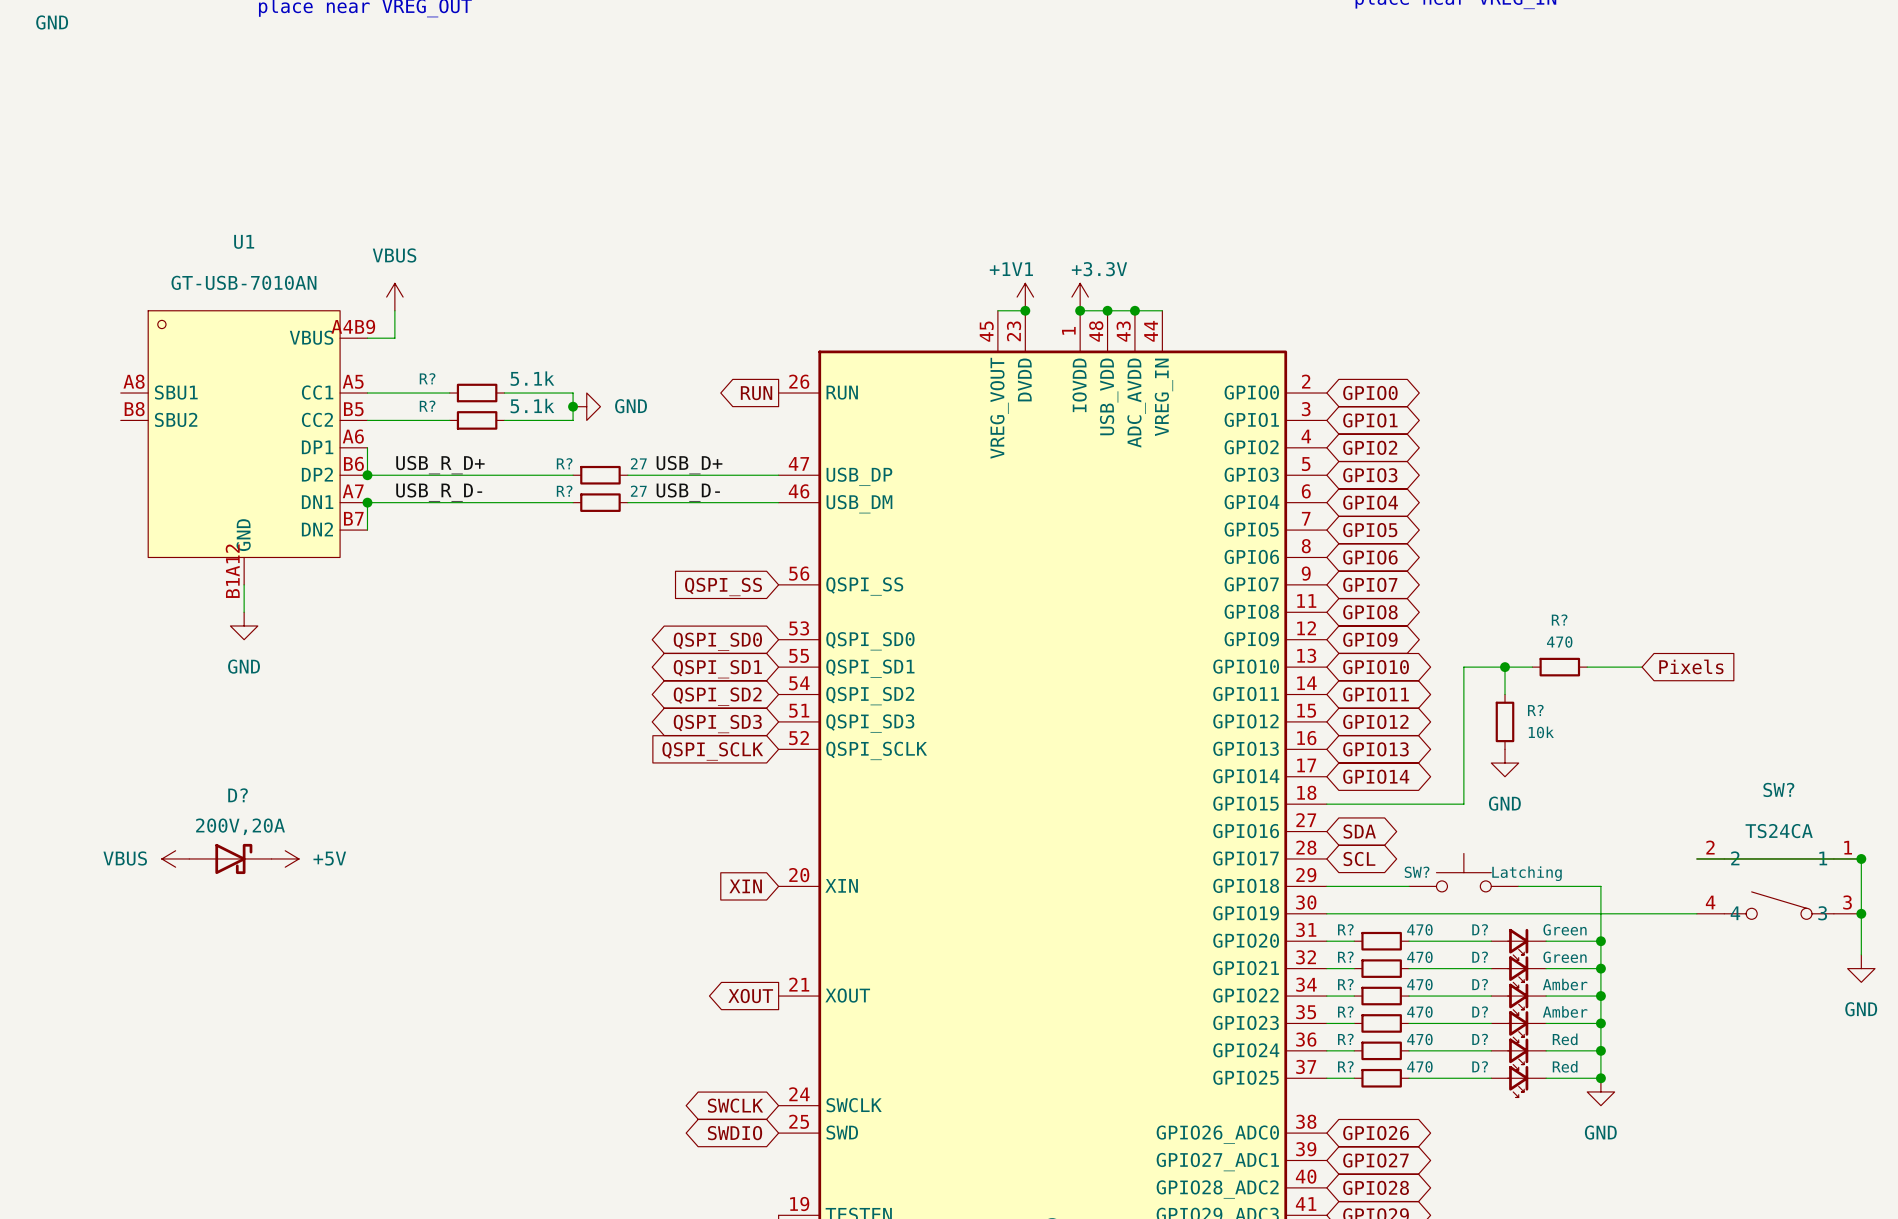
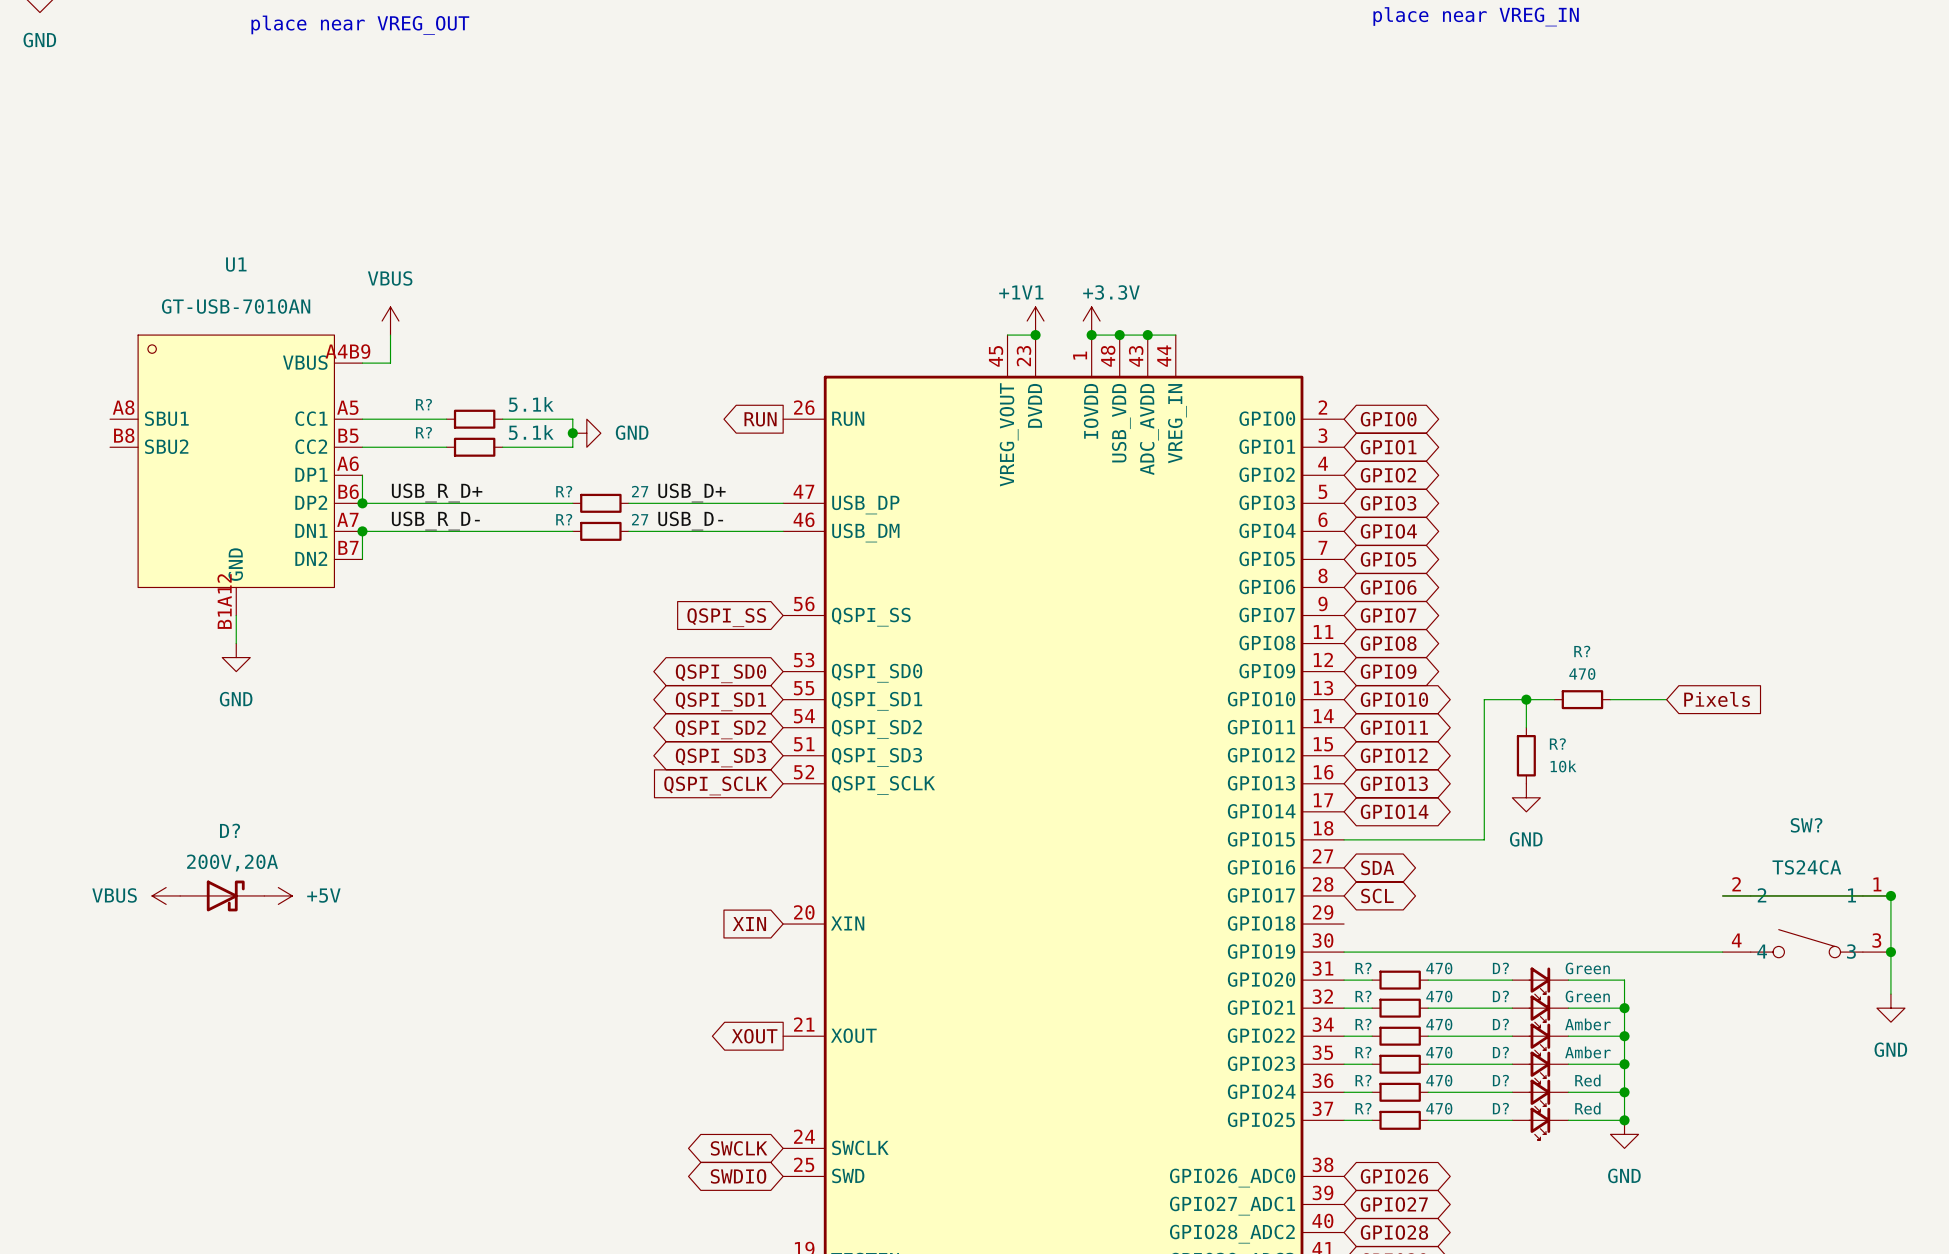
SW?: Latching (1463, 872) -> none
wire: (1326, 886) (1409, 886) -> none
wire: (1518, 886) (1600, 886) (1600, 941) -> none
junction: (1600, 941) -> none

